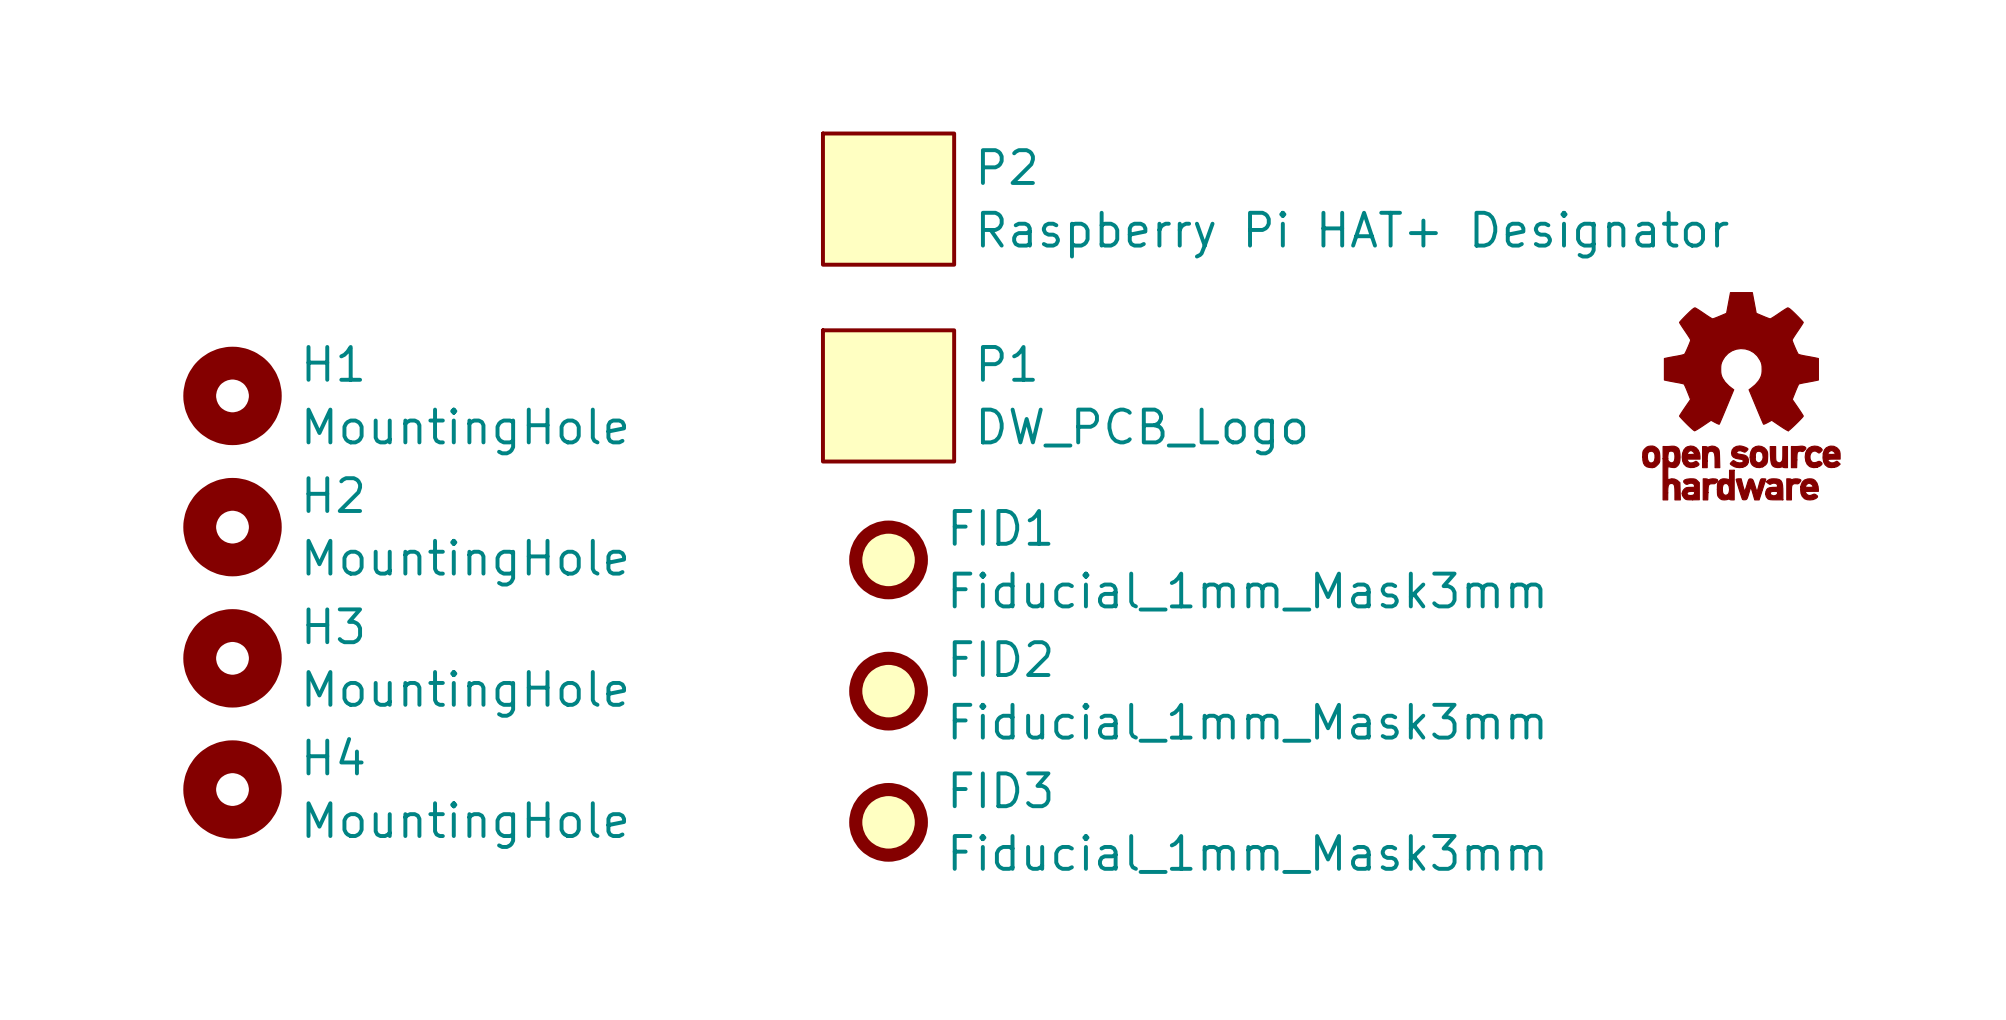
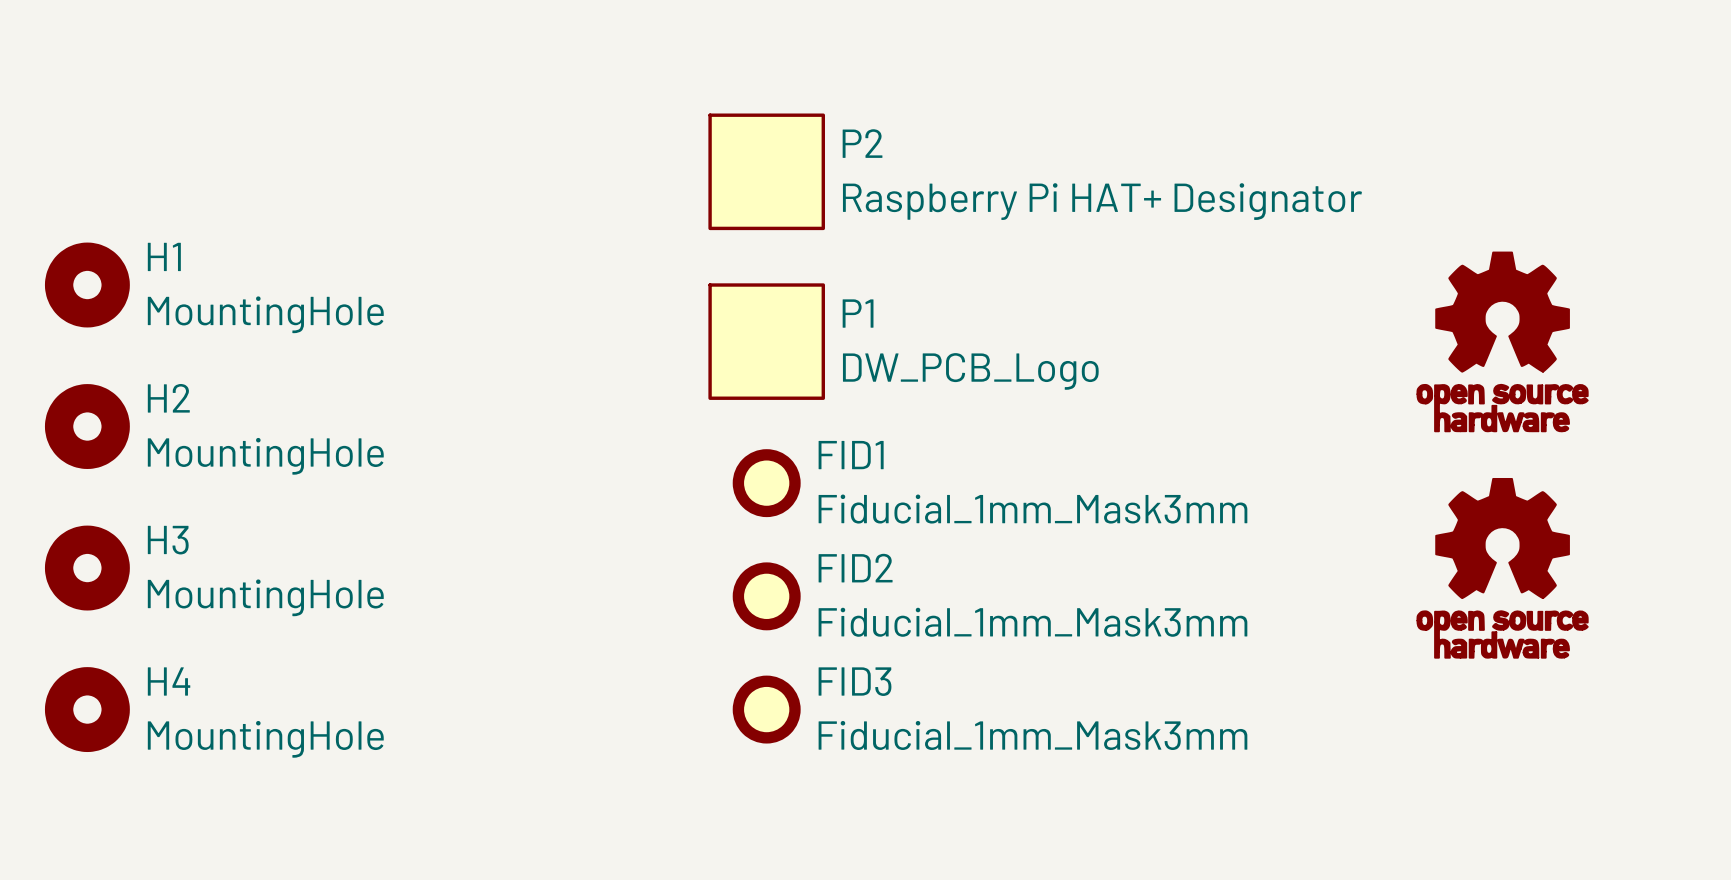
H1 position: (232, 395) -> (87, 285)
H2 position: (232, 527) -> (87, 426)
H3 position: (232, 658) -> (87, 568)
part: none -> (1502, 568)
H4 position: (232, 789) -> (87, 709)

